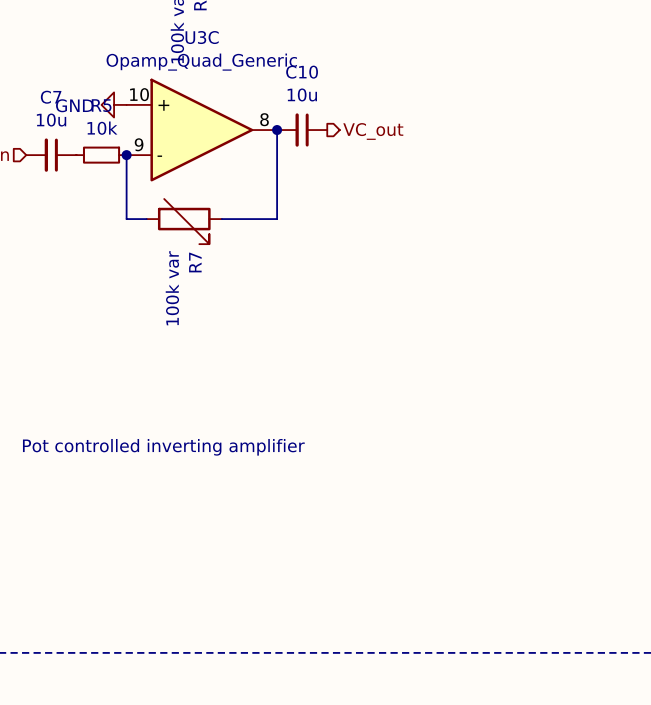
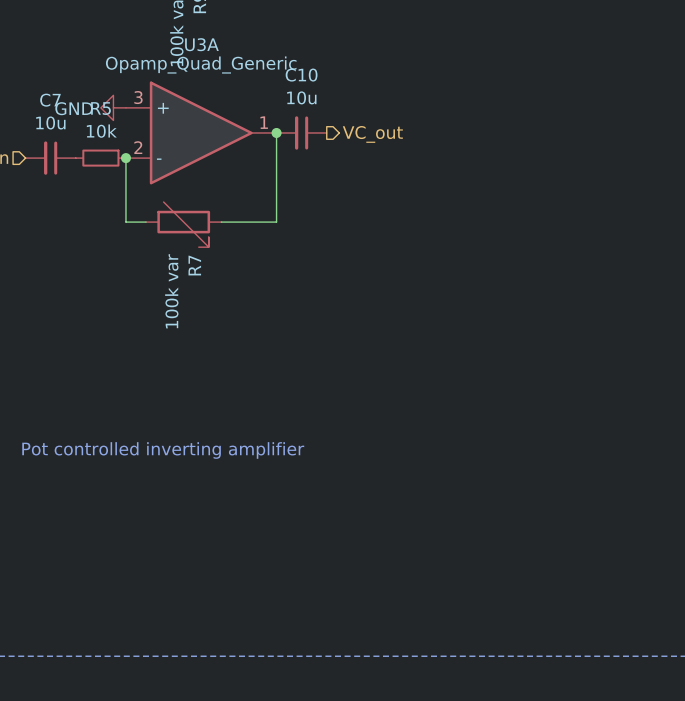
U3C name: U3C (202, 37) -> U3A (201, 44)
U3C pin number: 10 (139, 94) -> 3 (138, 97)
U3C pin number: 8 (264, 119) -> 1 (264, 122)
U3C pin number: 9 (139, 144) -> 2 (138, 147)

